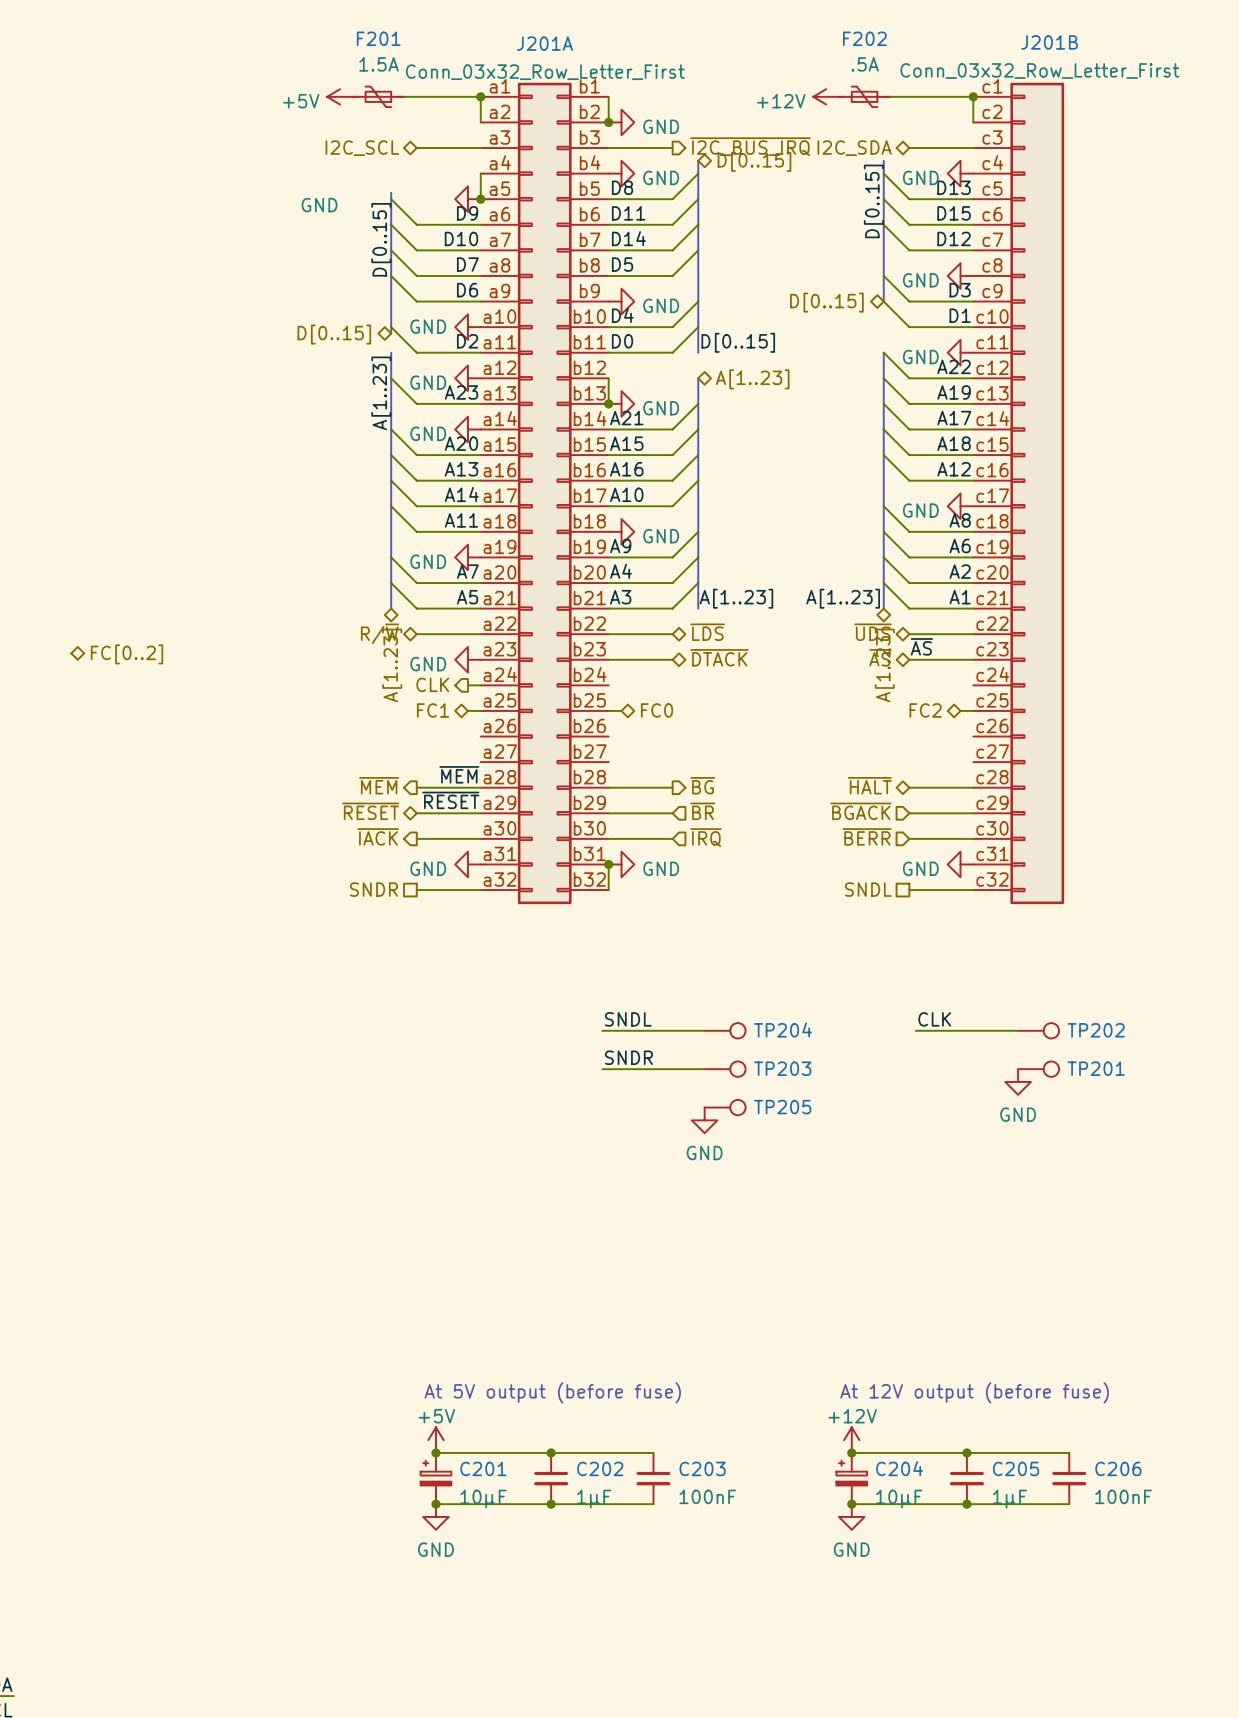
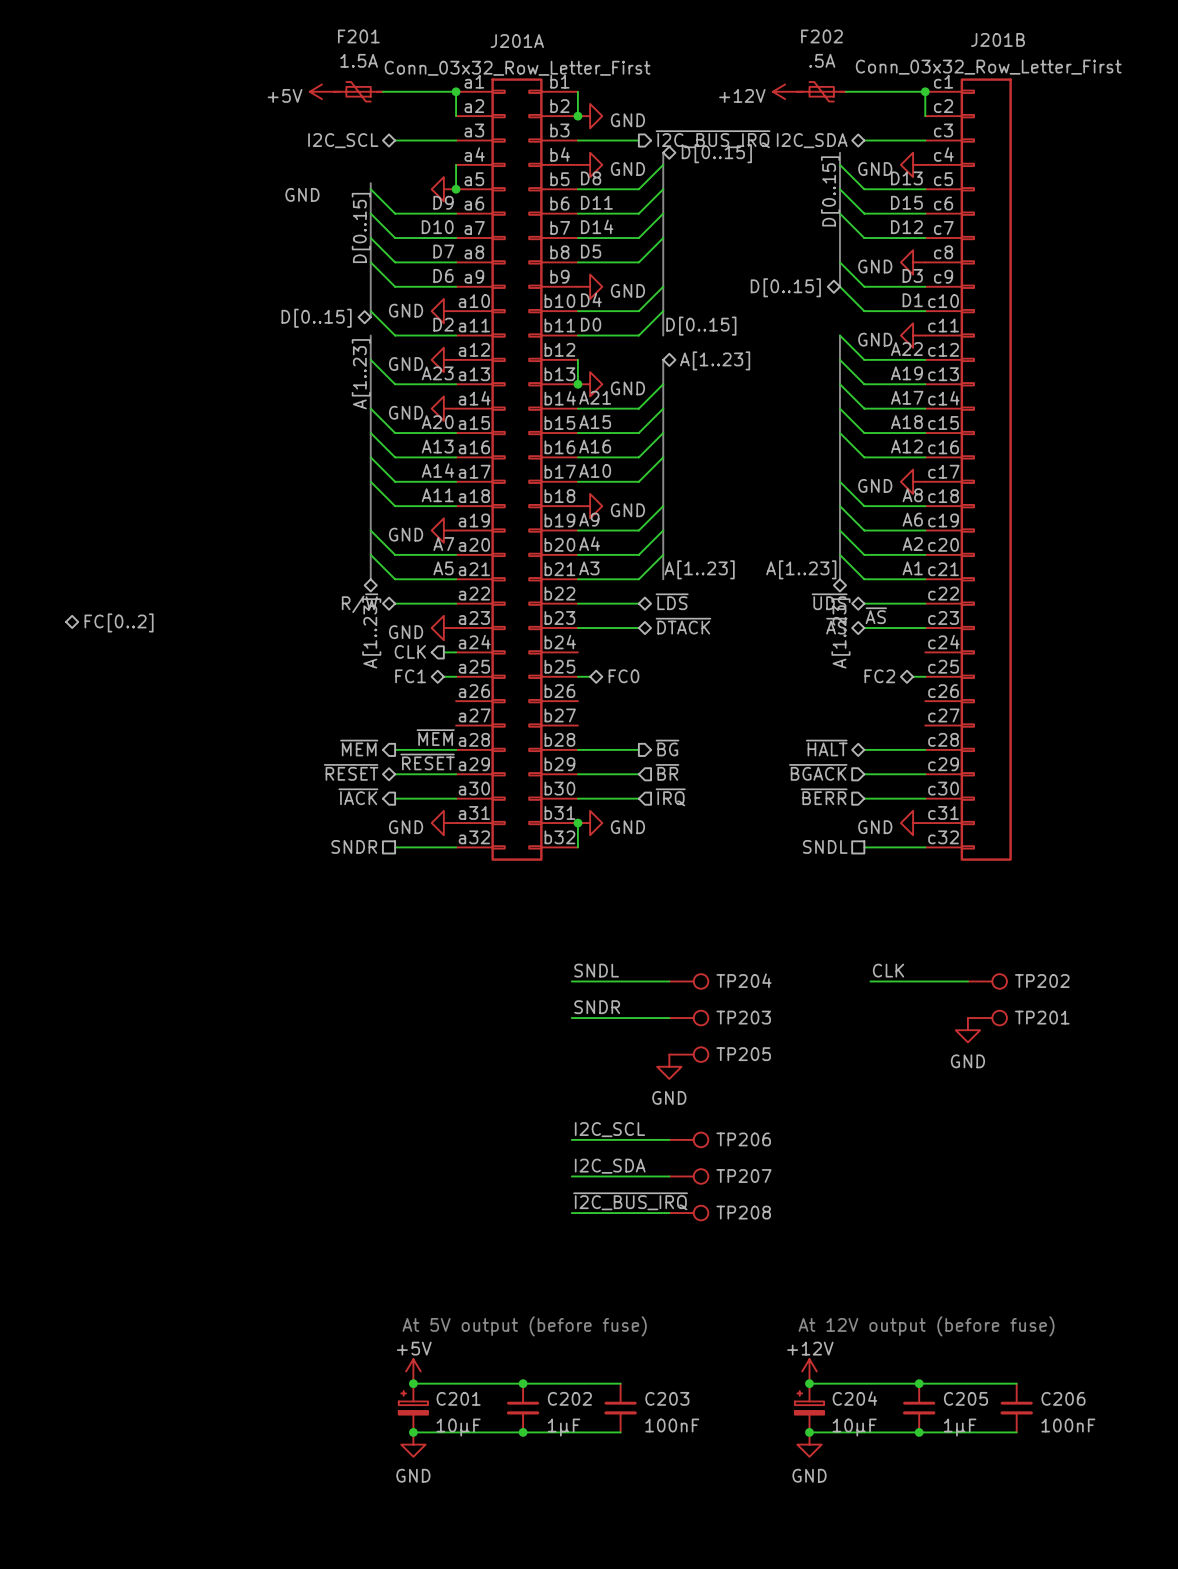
label: none -> I2C_SCL (609, 1129)
wire: none -> (571, 1139) (669, 1139)
TP206: none -> (688, 1139)
label: none -> I2C_SDA (610, 1166)
wire: none -> (571, 1176) (669, 1176)
TP207: none -> (688, 1176)
label: none -> ~{I2C_BUS_IRQ} (630, 1201)
wire: none -> (571, 1213) (669, 1213)
TP208: none -> (688, 1213)

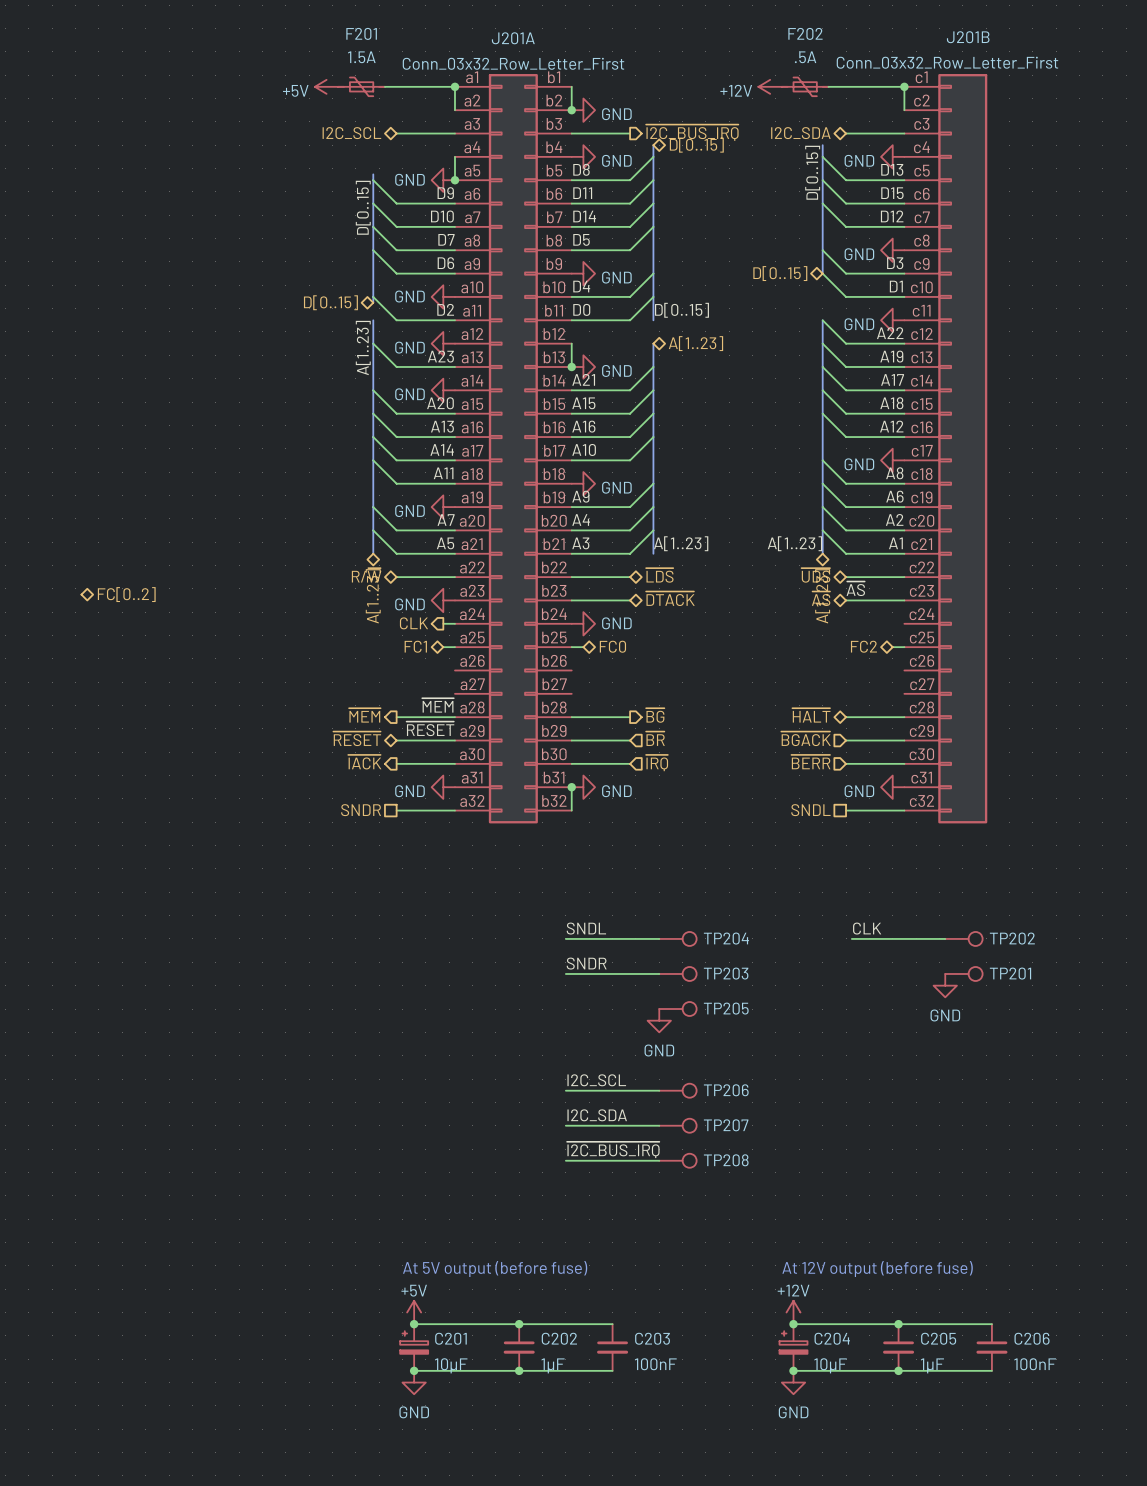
power symbol text position: GND (302, 194) -> GND (409, 179)
power symbol: none -> GND (583, 623)

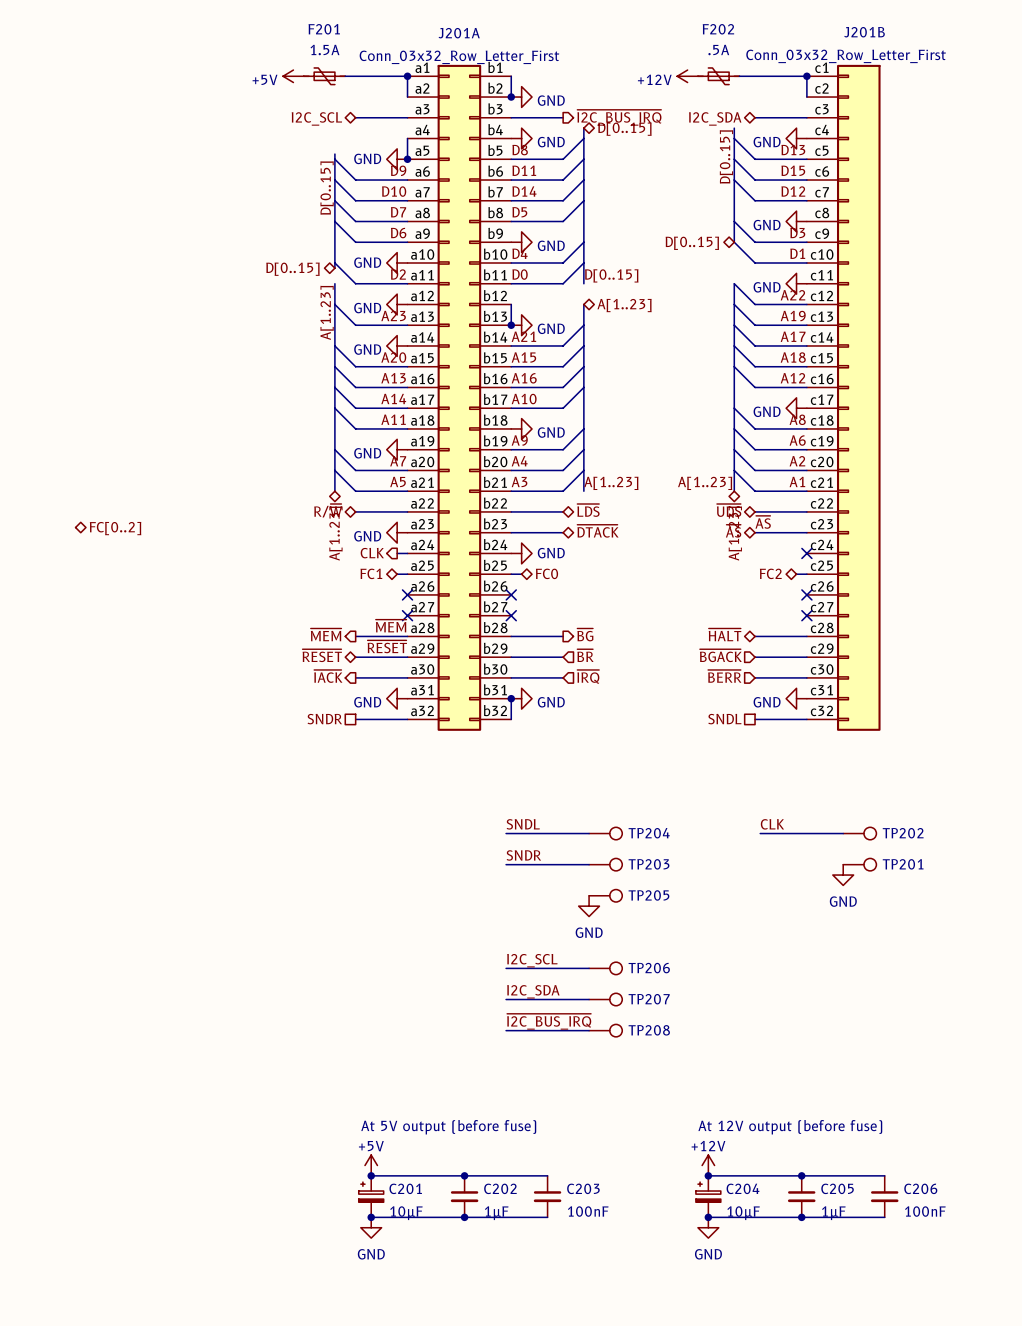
no-connect mark: none -> (806, 553)
no-connect mark: none -> (407, 594)
no-connect mark: none -> (511, 594)
no-connect mark: none -> (806, 594)
no-connect mark: none -> (407, 615)
no-connect mark: none -> (511, 615)
no-connect mark: none -> (806, 615)

